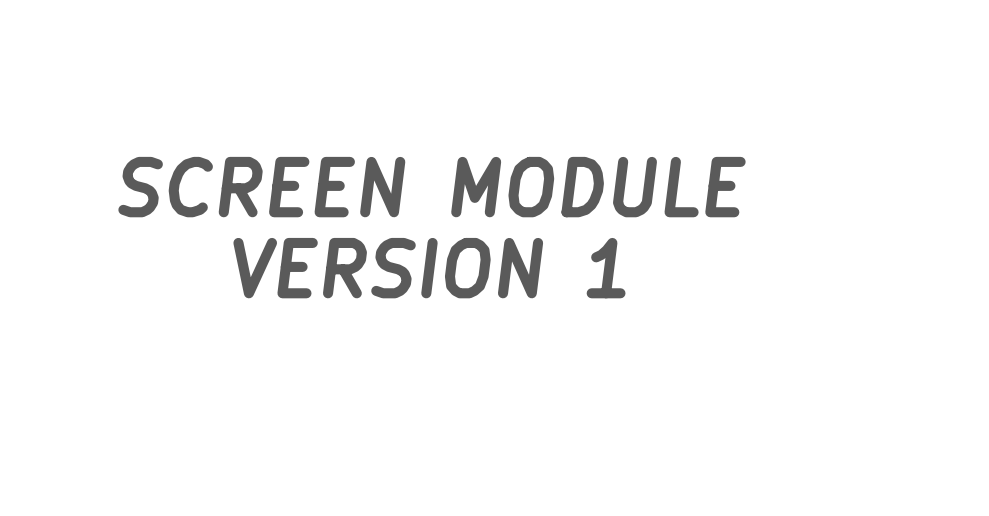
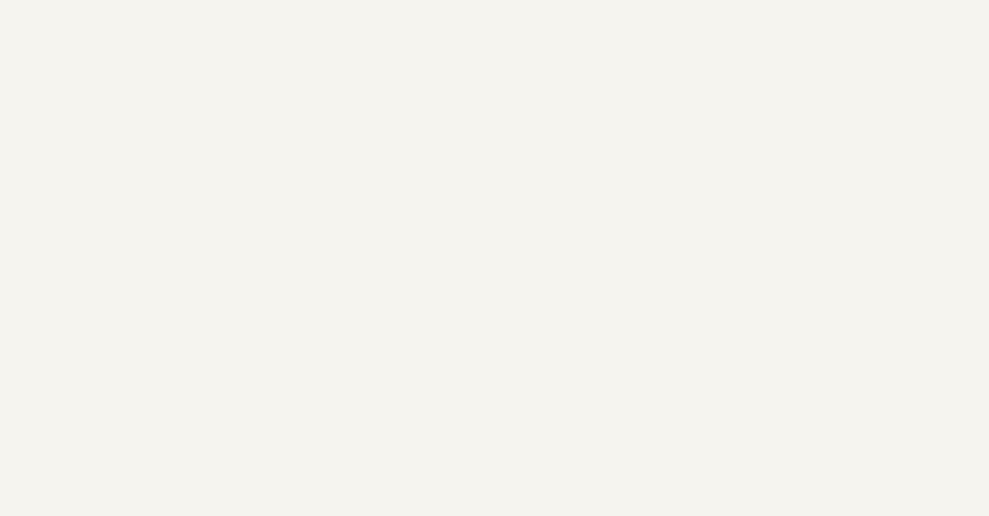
text: SCREEN MODULE (432, 187) -> none
text: VERSION 1 (429, 268) -> none

